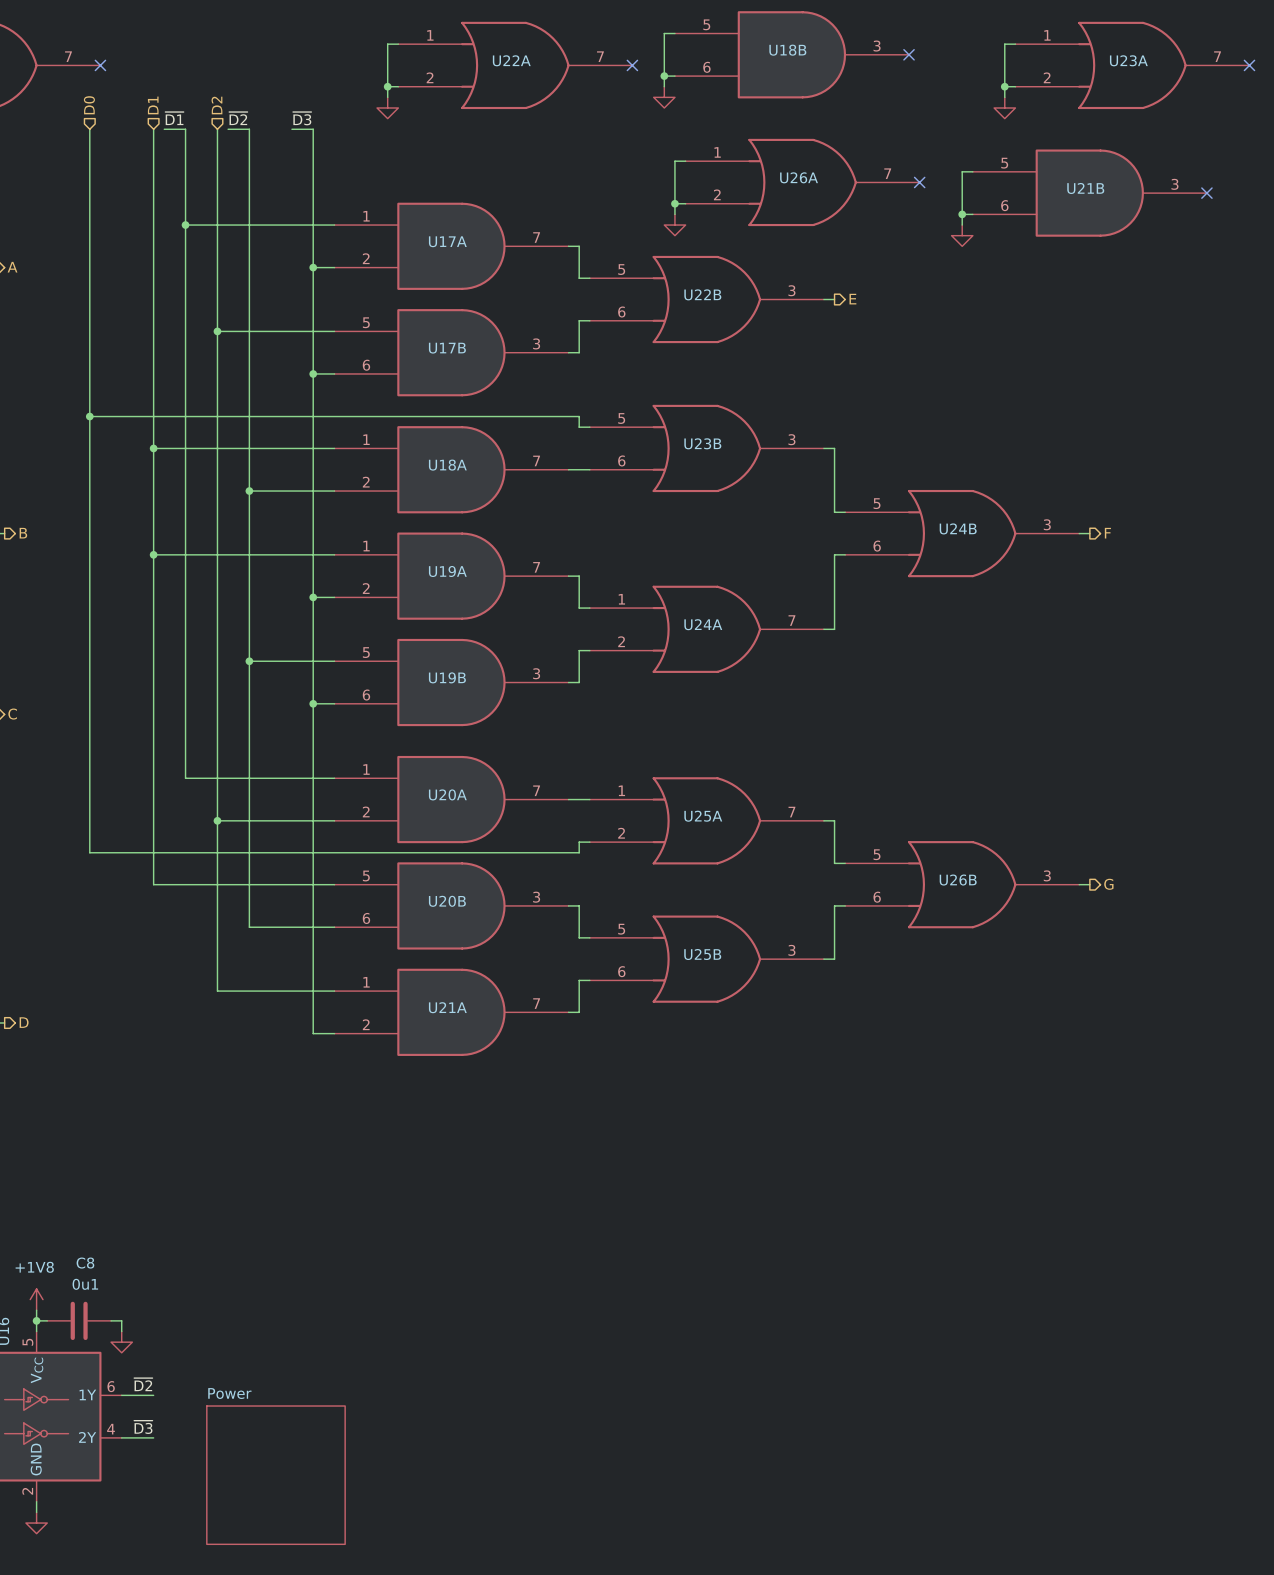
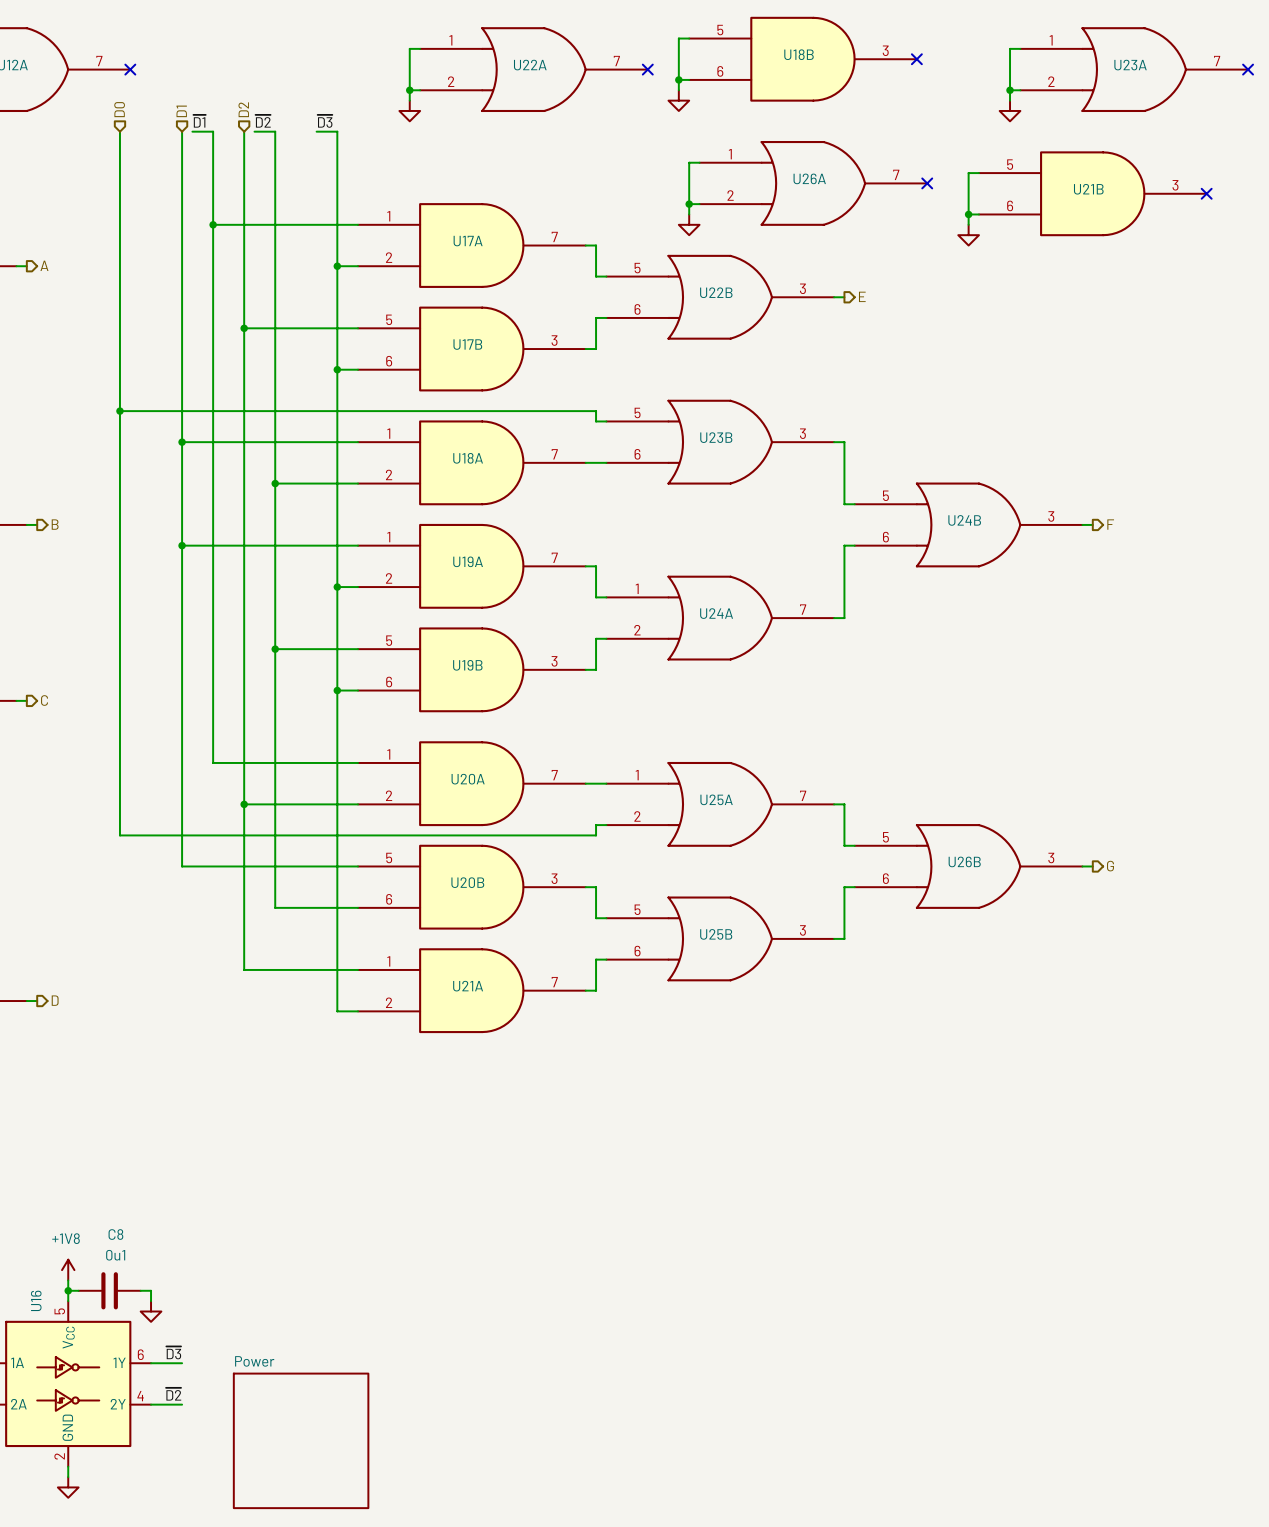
label: ~{D2} (143, 1384) -> ~{D3} (173, 1352)
label: ~{D3} (143, 1427) -> ~{D2} (173, 1394)

